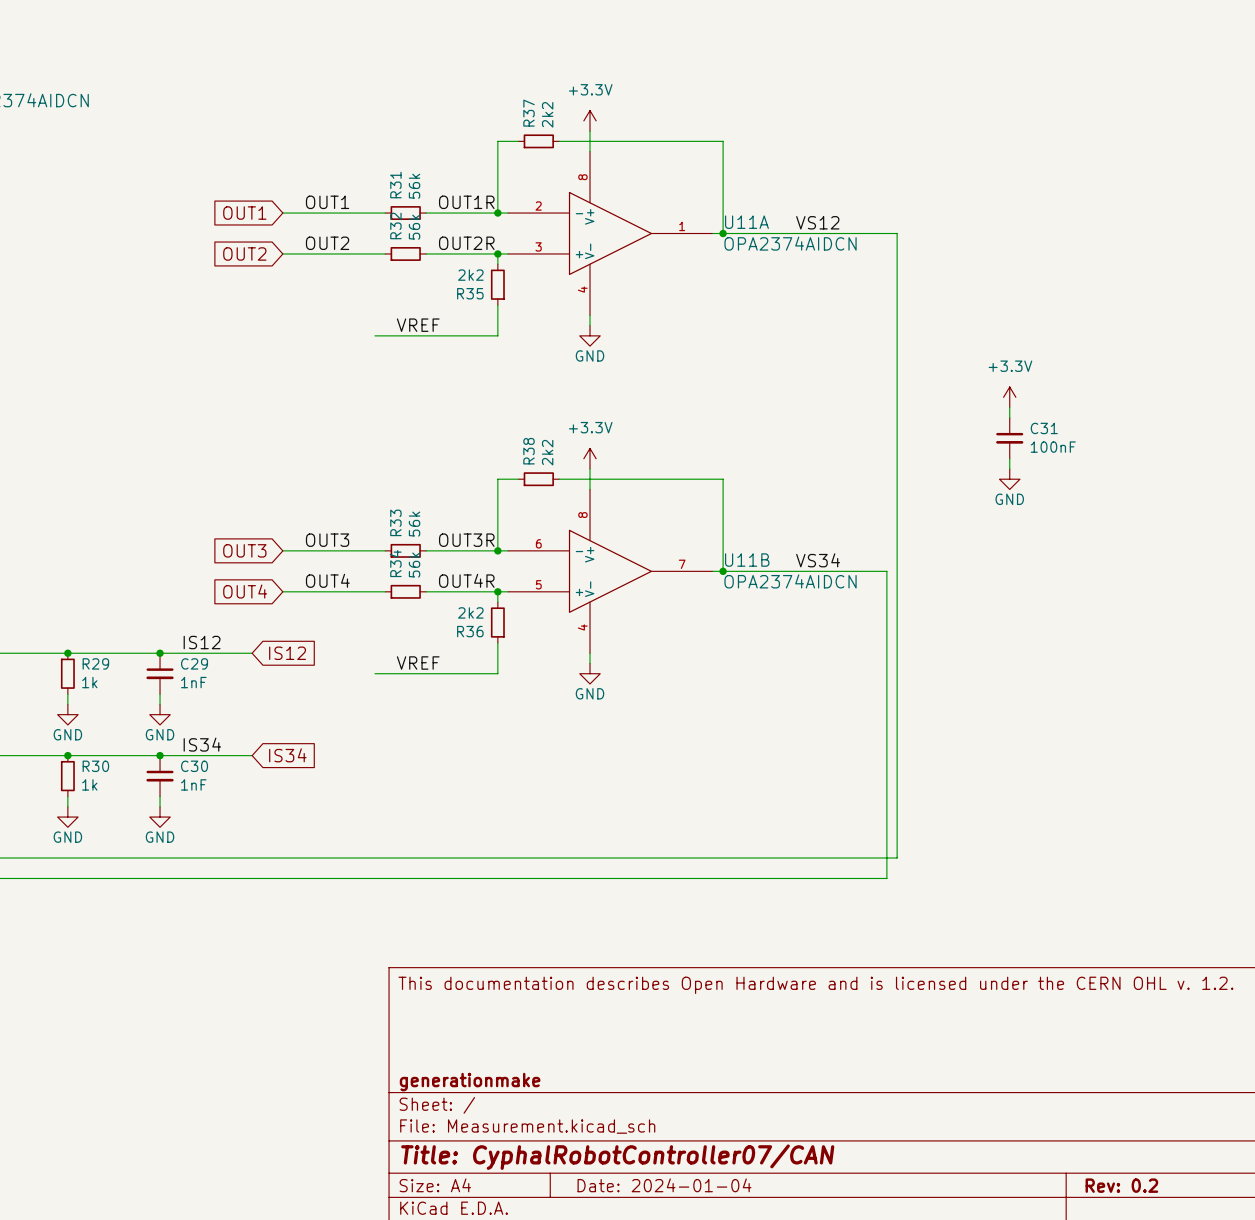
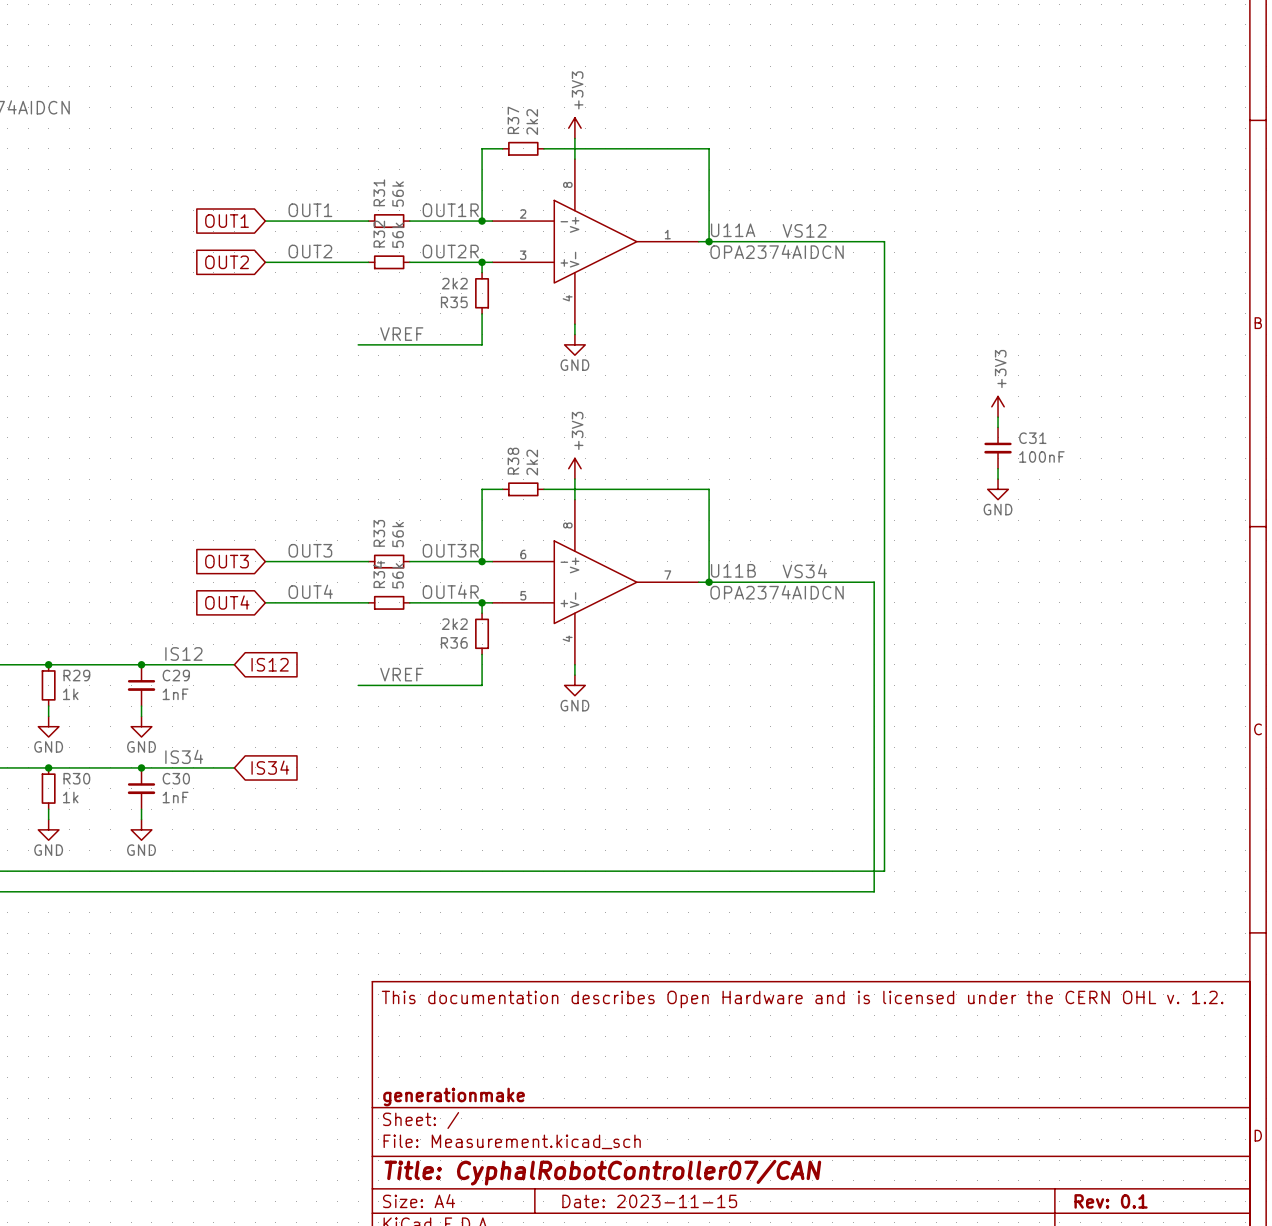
power symbol: +3.3V (589, 120) -> +3V3 (574, 128)
power symbol: +3.3V (1009, 397) -> +3V3 (998, 406)
power symbol: +3.3V (589, 458) -> +3V3 (574, 468)
title block: Date: 2024-01-04 (664, 1185) -> Date: 2023-11-15 (649, 1201)
title block: Rev: 0.2 (1121, 1185) -> Rev: 0.1 (1111, 1201)

